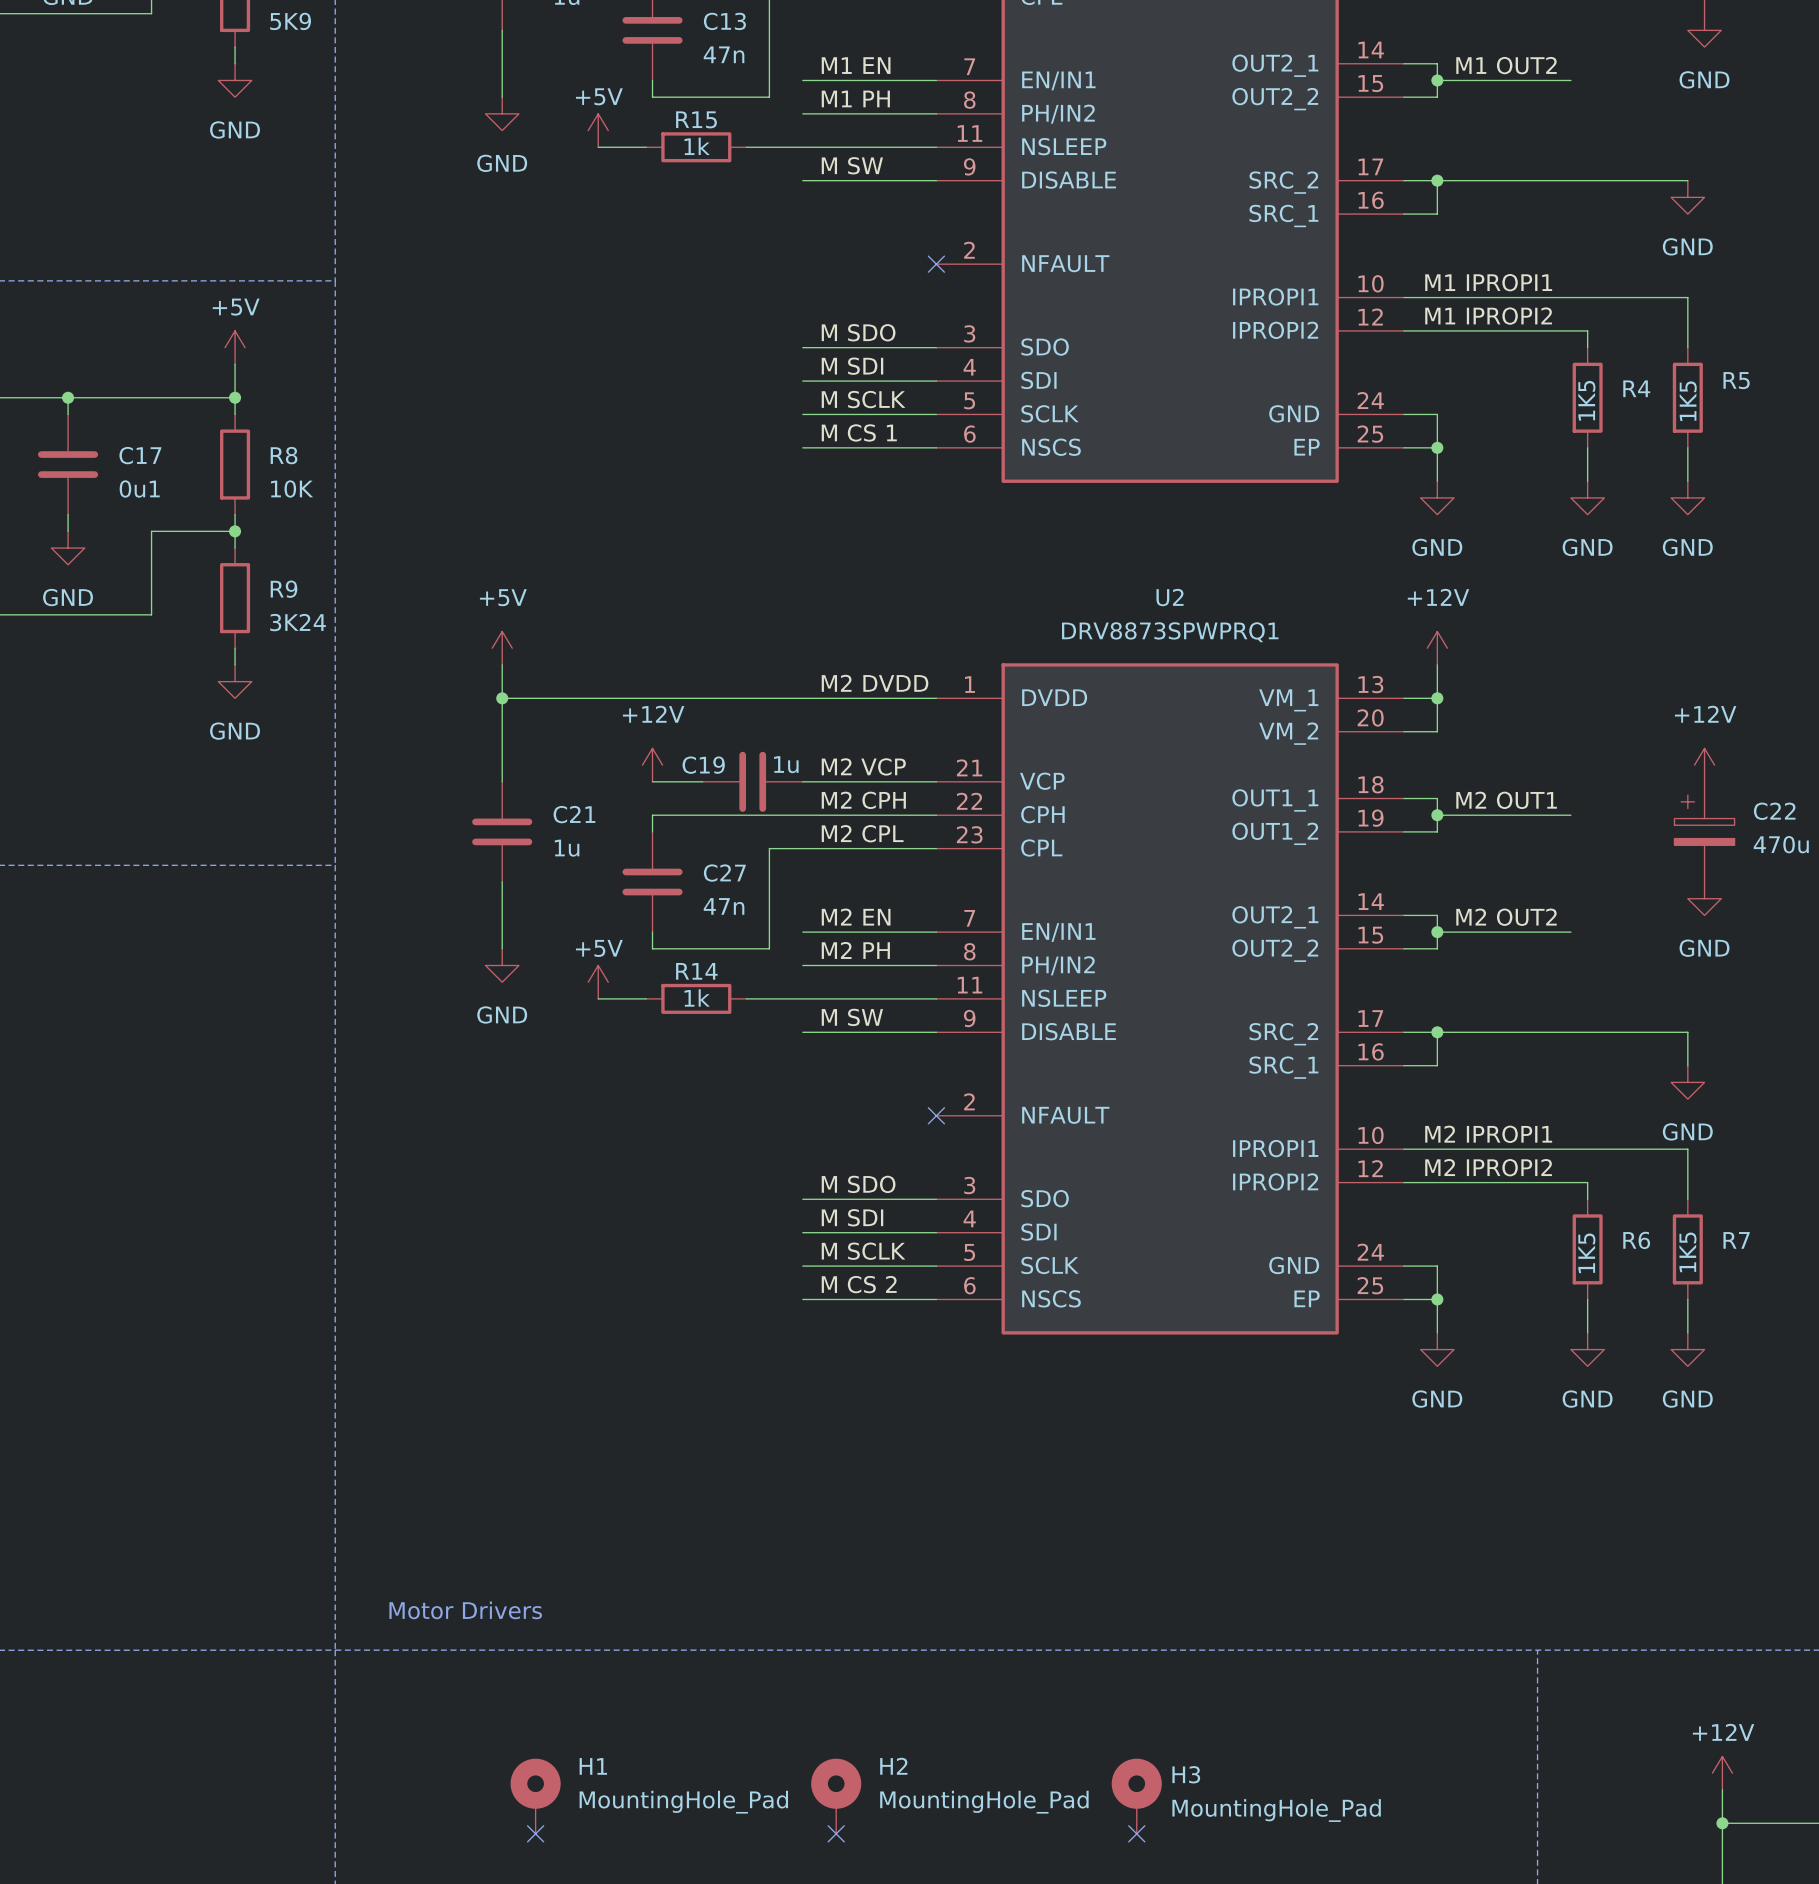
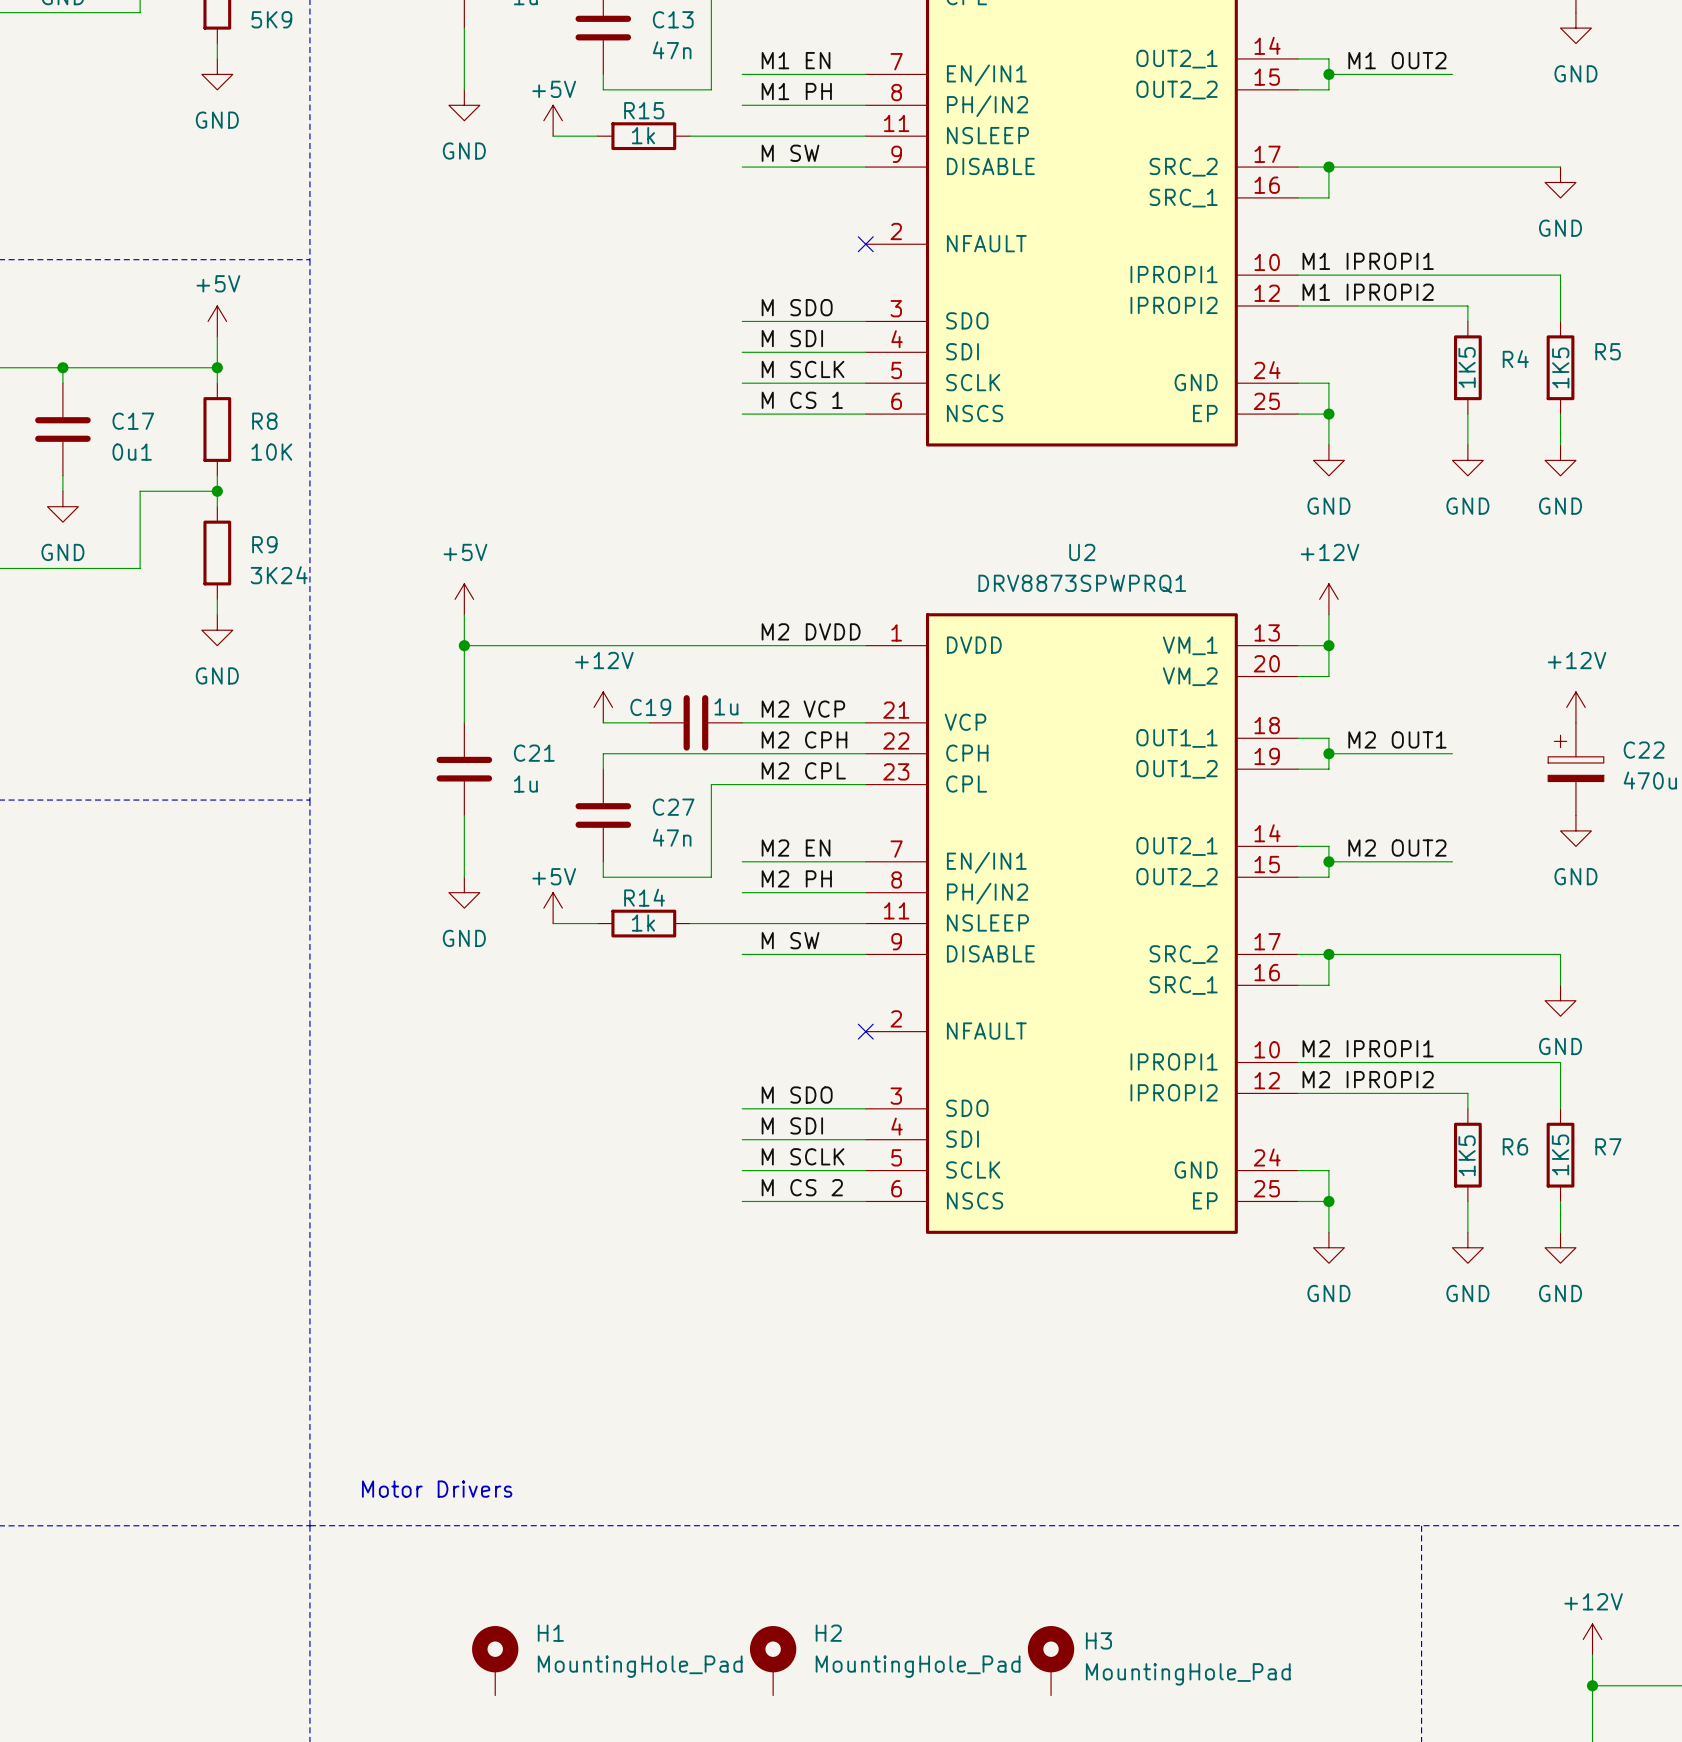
no-connect mark: (535, 1833) -> none
no-connect mark: (836, 1833) -> none
no-connect mark: (1136, 1833) -> none

